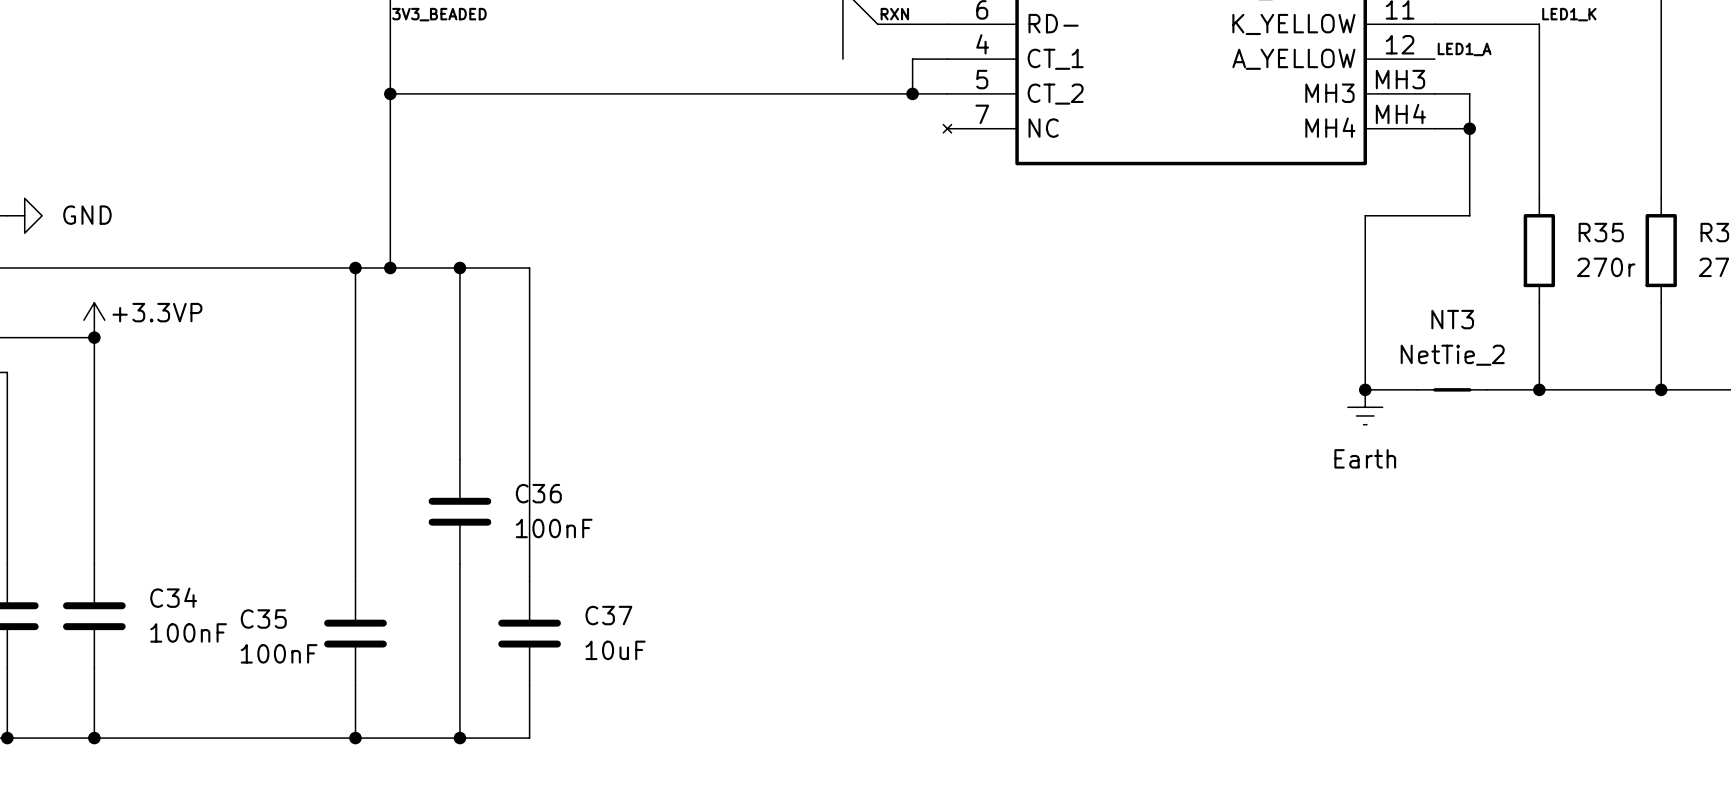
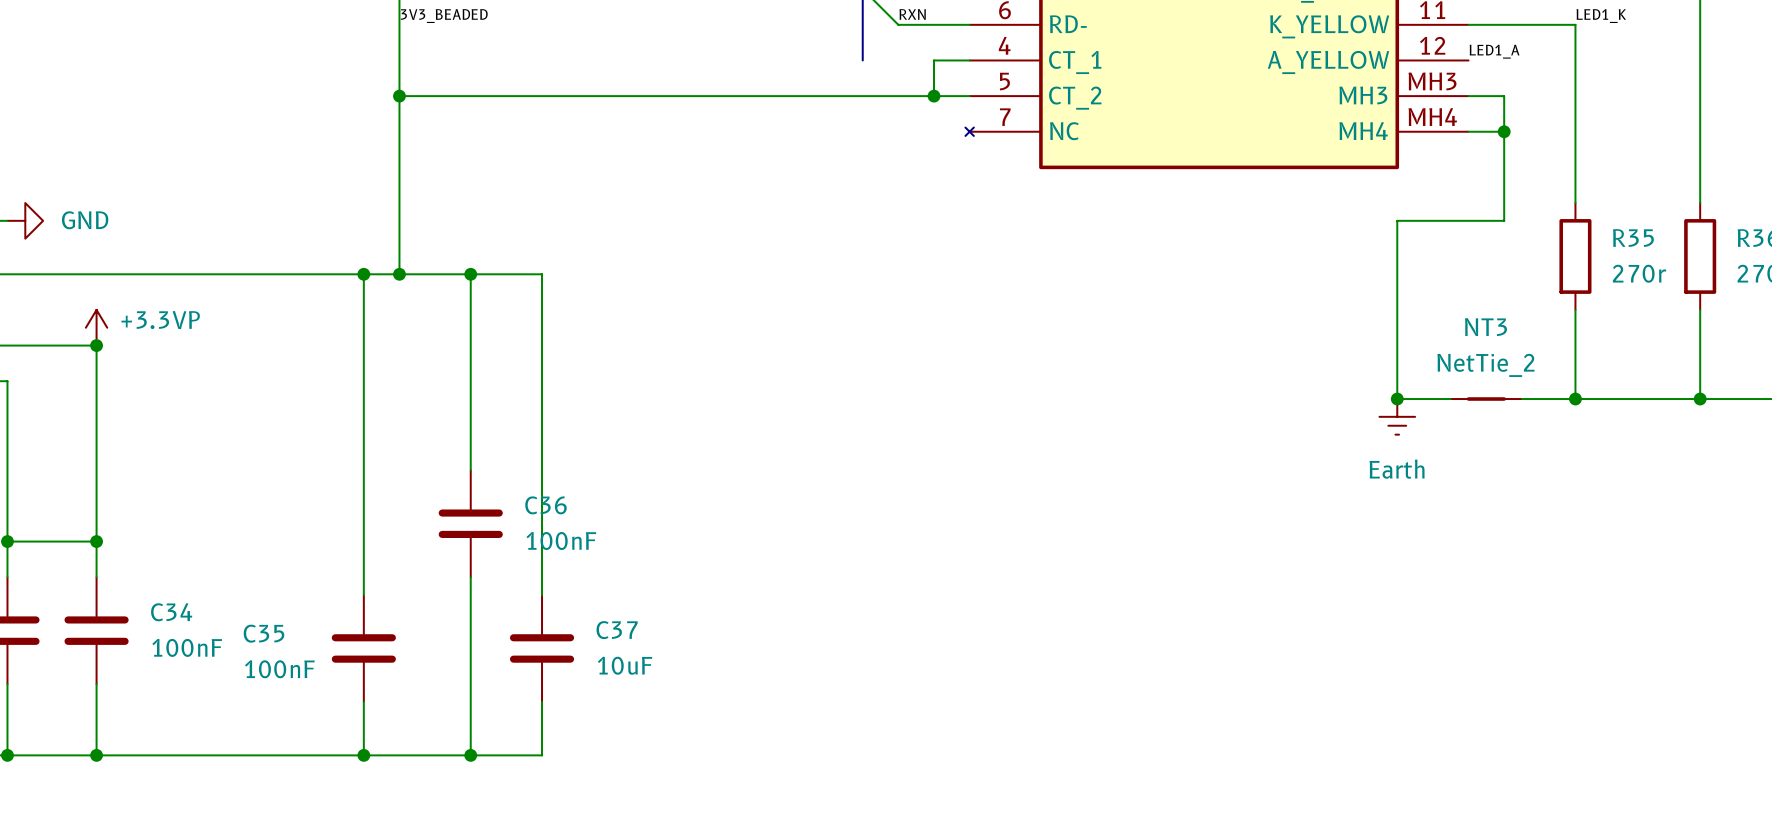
wire: none -> (7, 541) (96, 541)
junction: none -> (7, 541)
junction: none -> (96, 541)

